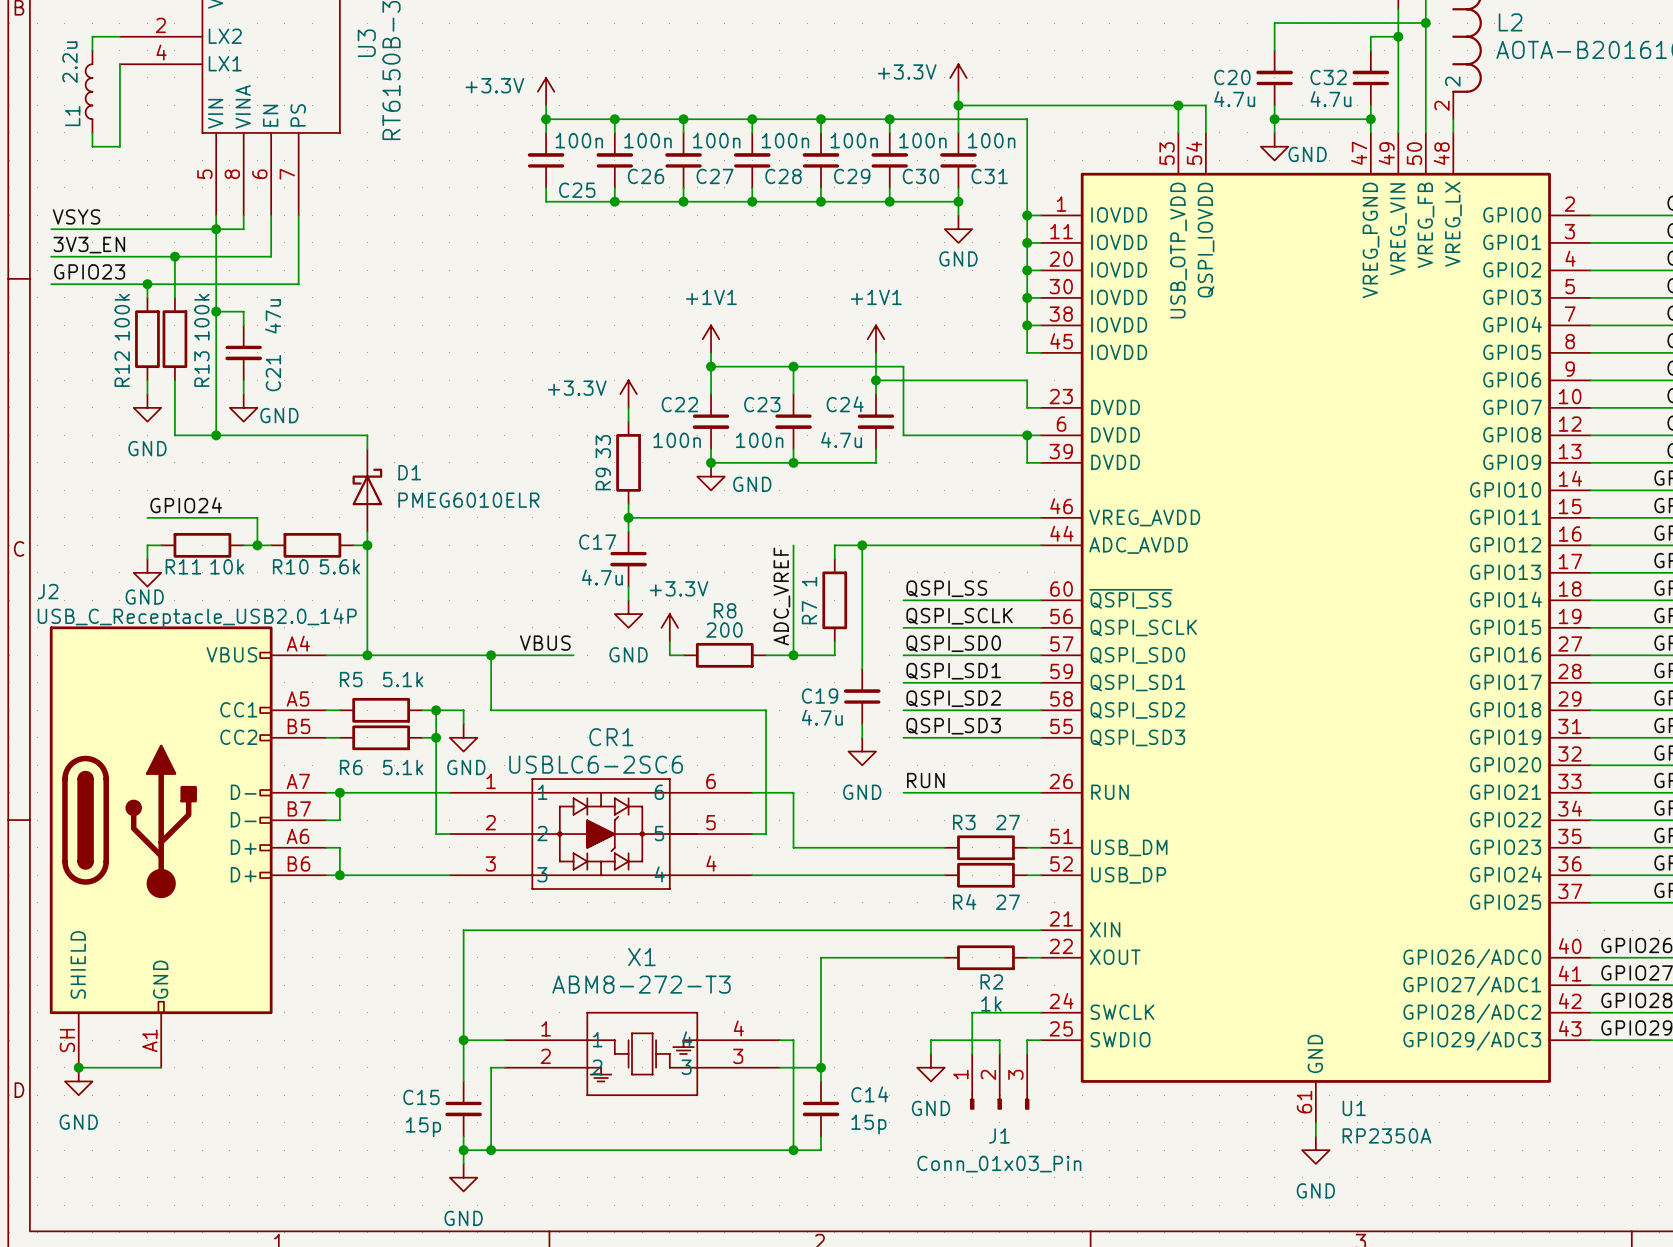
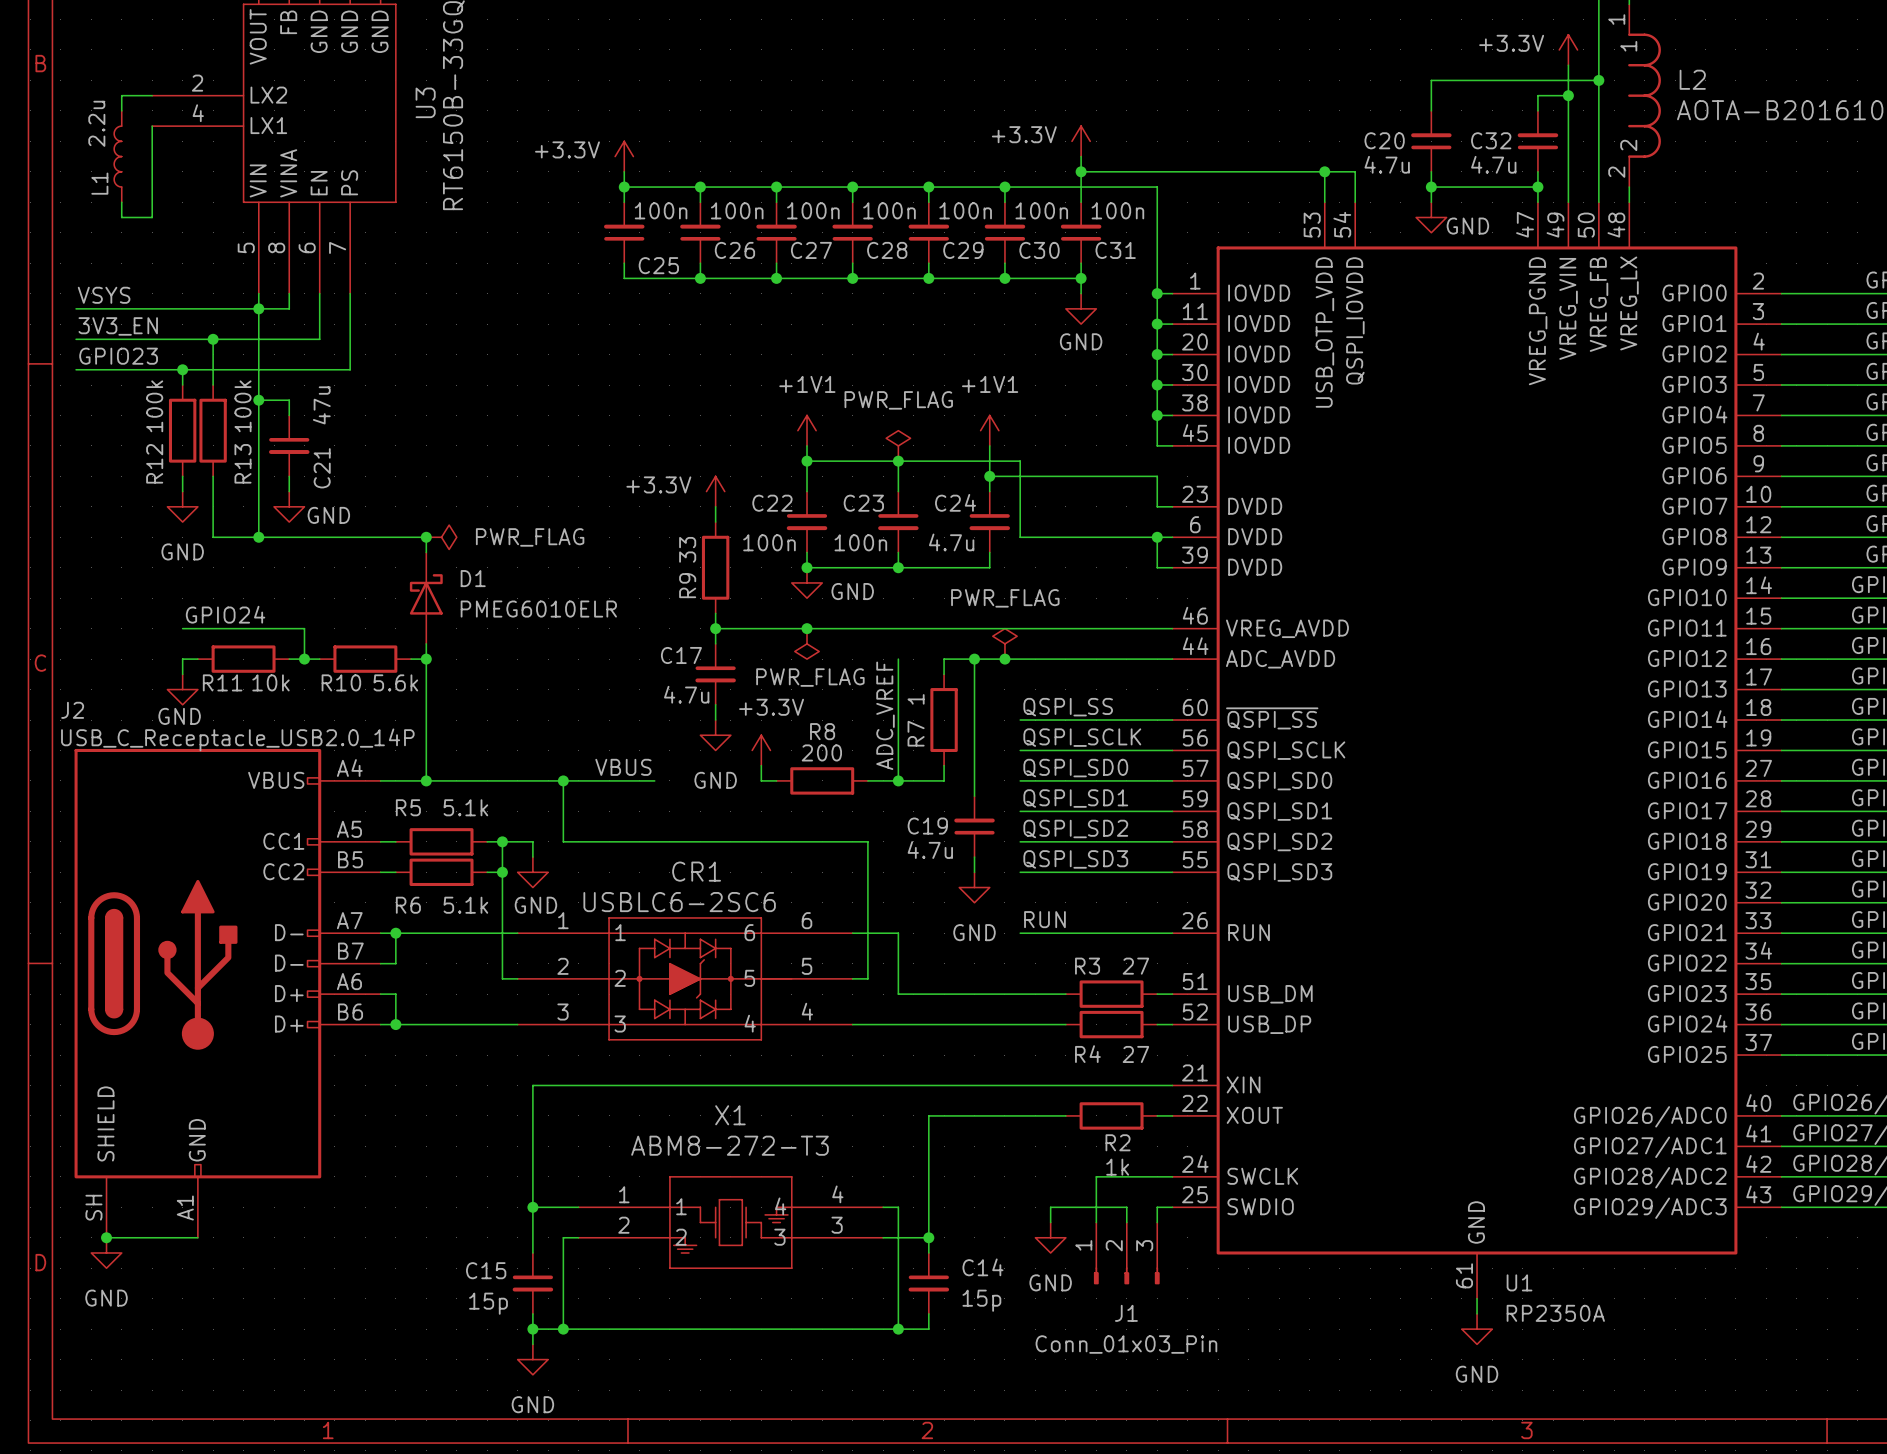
power symbol: none -> PWR_FLAG (898, 445)
junction: none -> (426, 537)
power symbol: none -> PWR_FLAG (441, 537)
junction: none -> (807, 628)
power symbol: none -> PWR_FLAG (807, 643)
power symbol: none -> PWR_FLAG (1004, 643)
junction: none -> (1004, 659)

